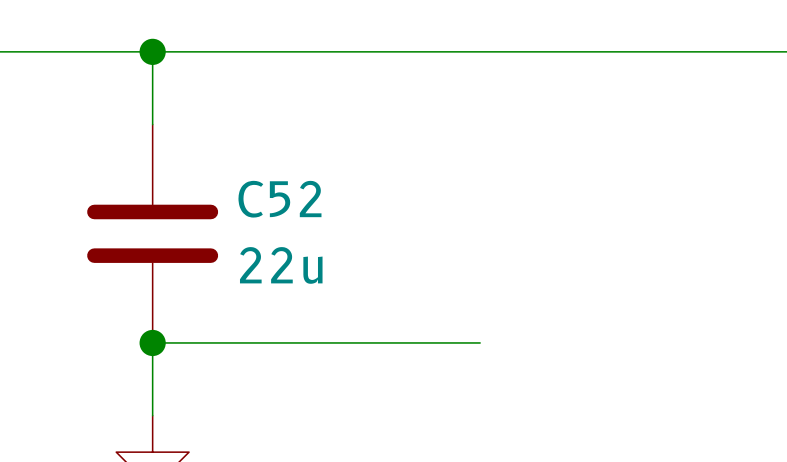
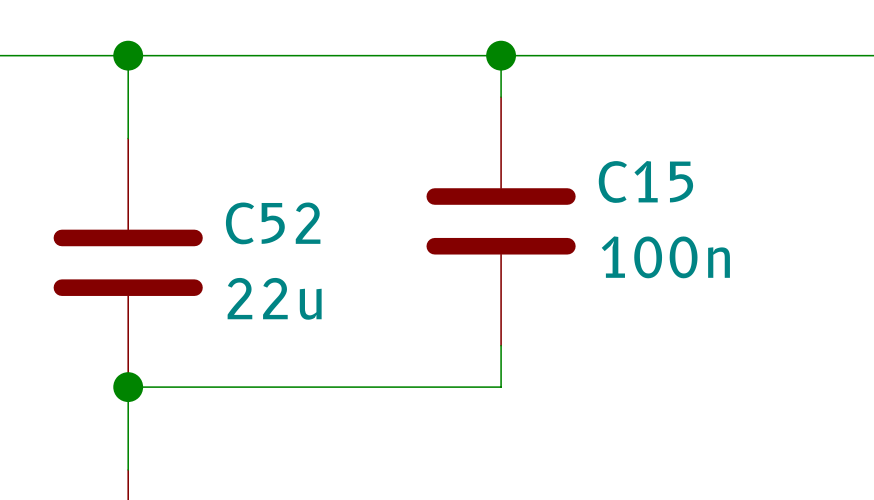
wire: none -> (501, 55) (501, 97)
junction: none -> (501, 55)
C15: none -> 100n (501, 221)
wire: none -> (501, 345) (501, 387)

